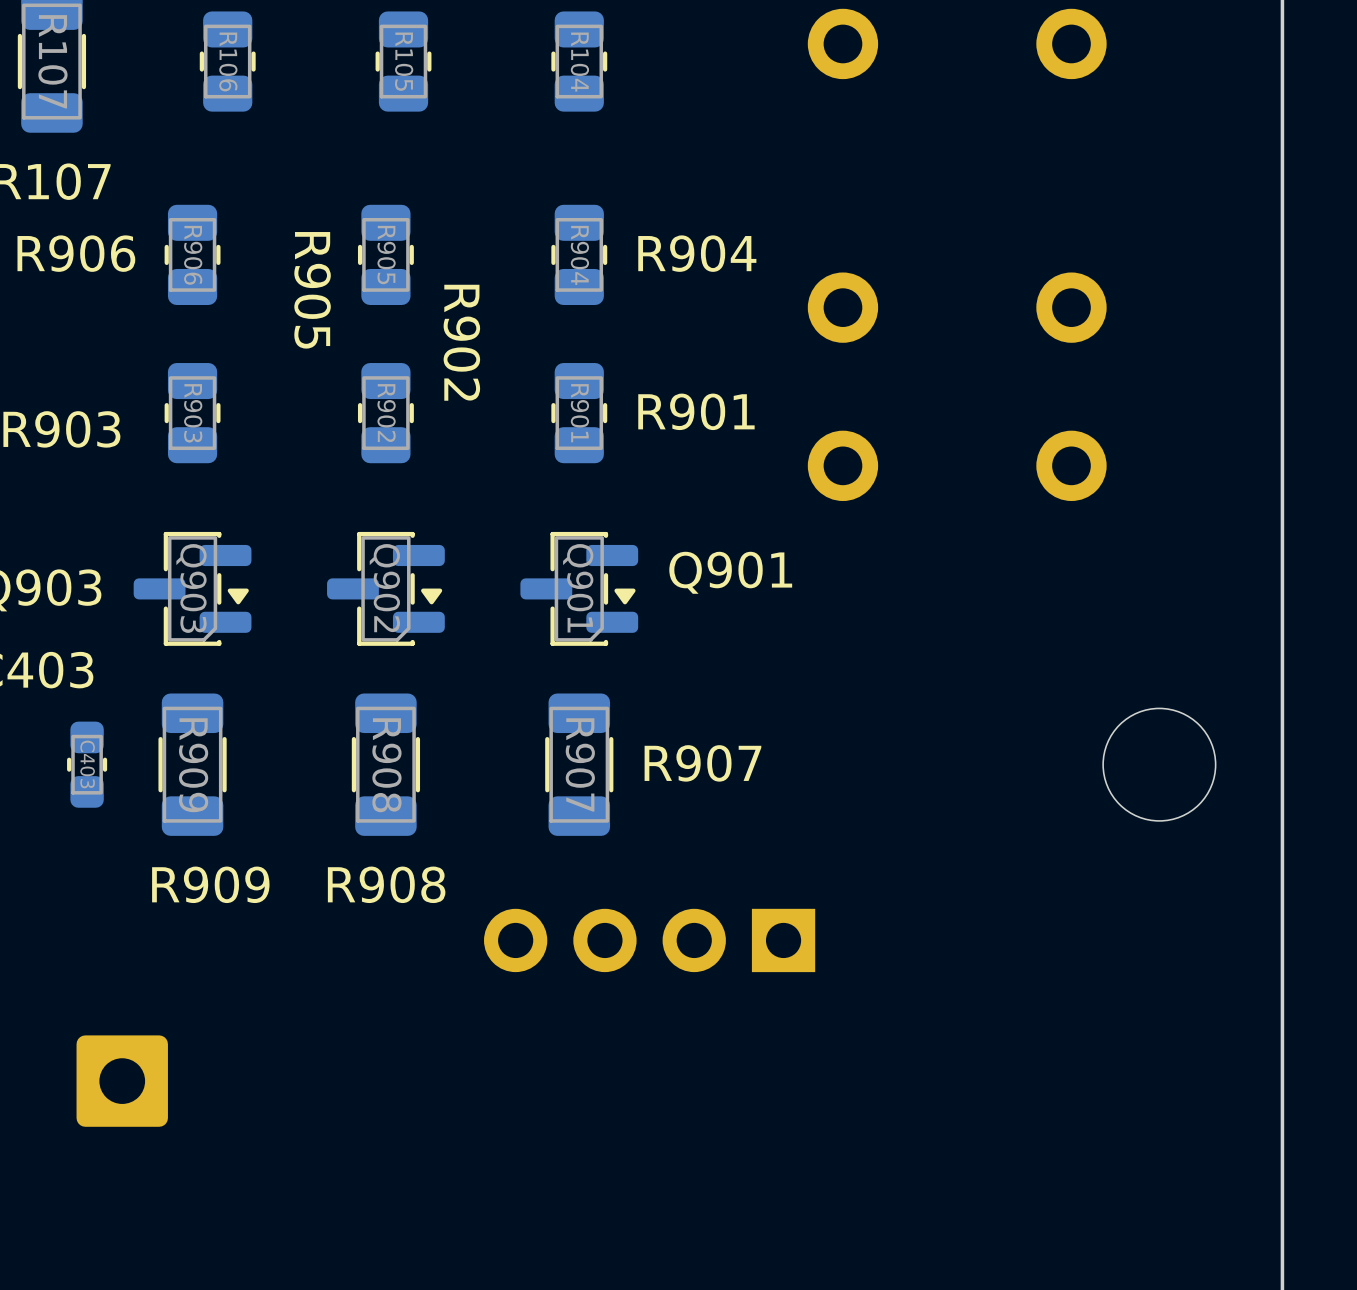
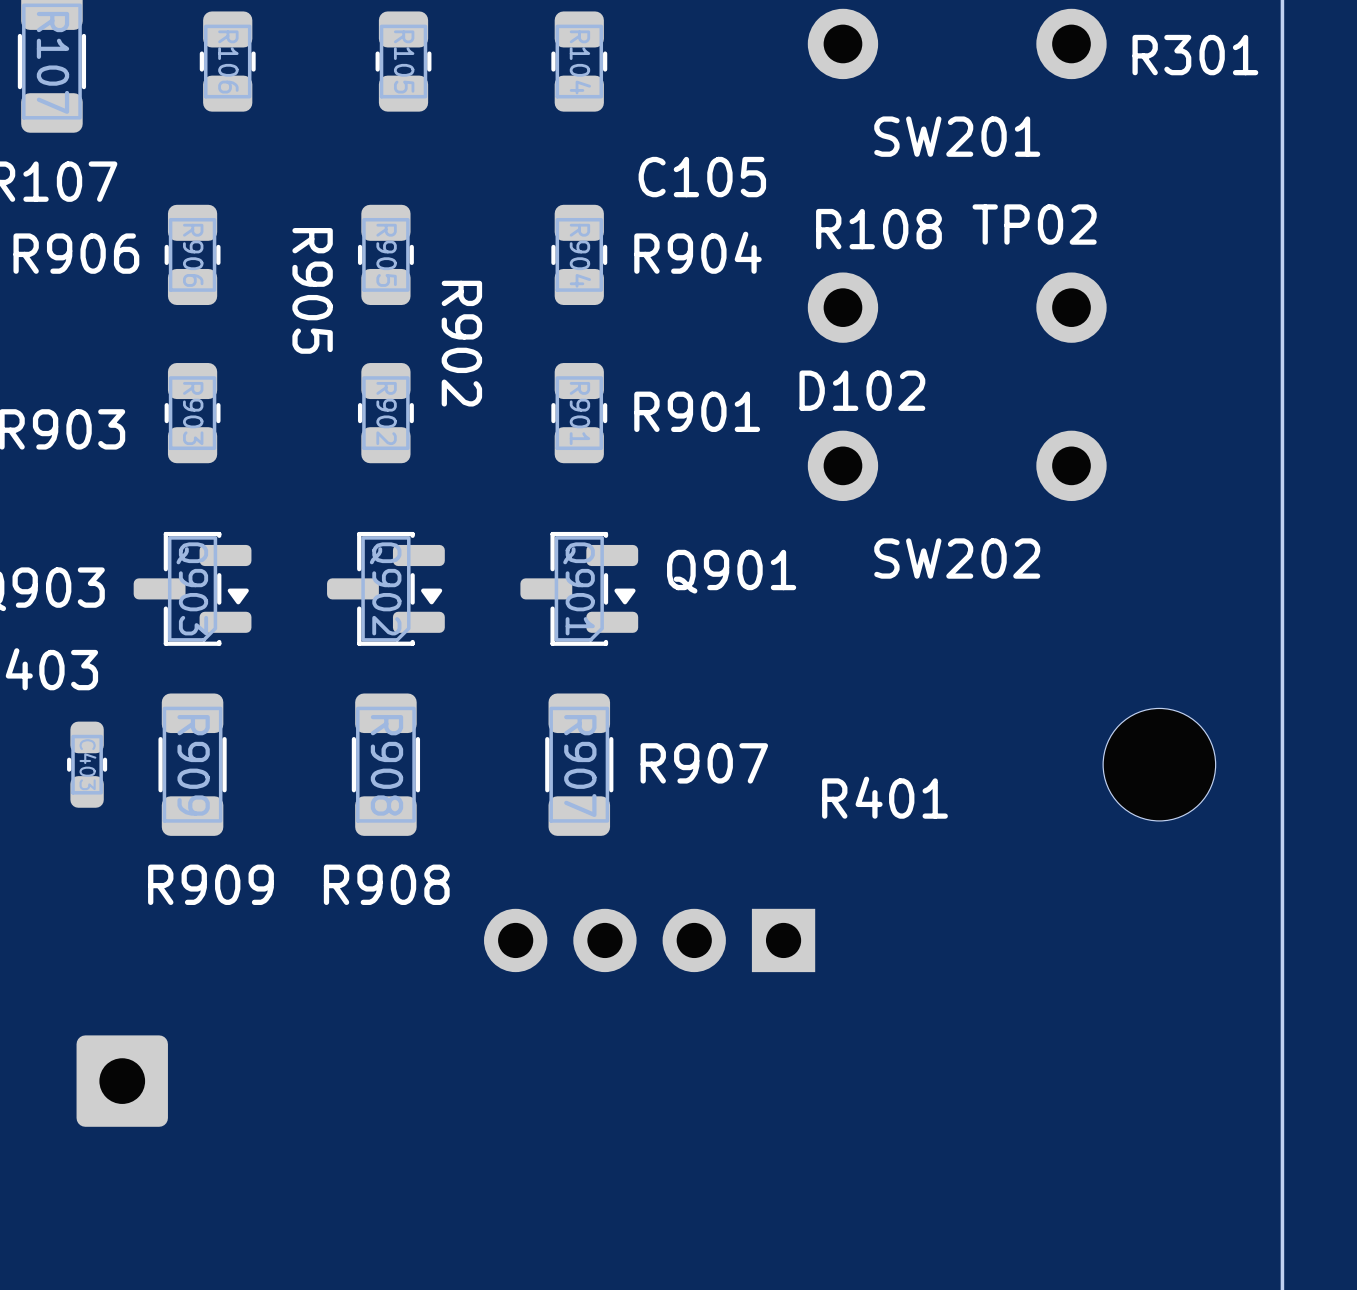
text: none -> R301 (1195, 55)
text: none -> SW201 (957, 136)
text: none -> C105 (702, 177)
text: none -> TP02 (1034, 224)
text: none -> R108 (878, 229)
text: none -> D102 (862, 390)
text: none -> SW202 (957, 558)
text: none -> R401 (884, 797)

